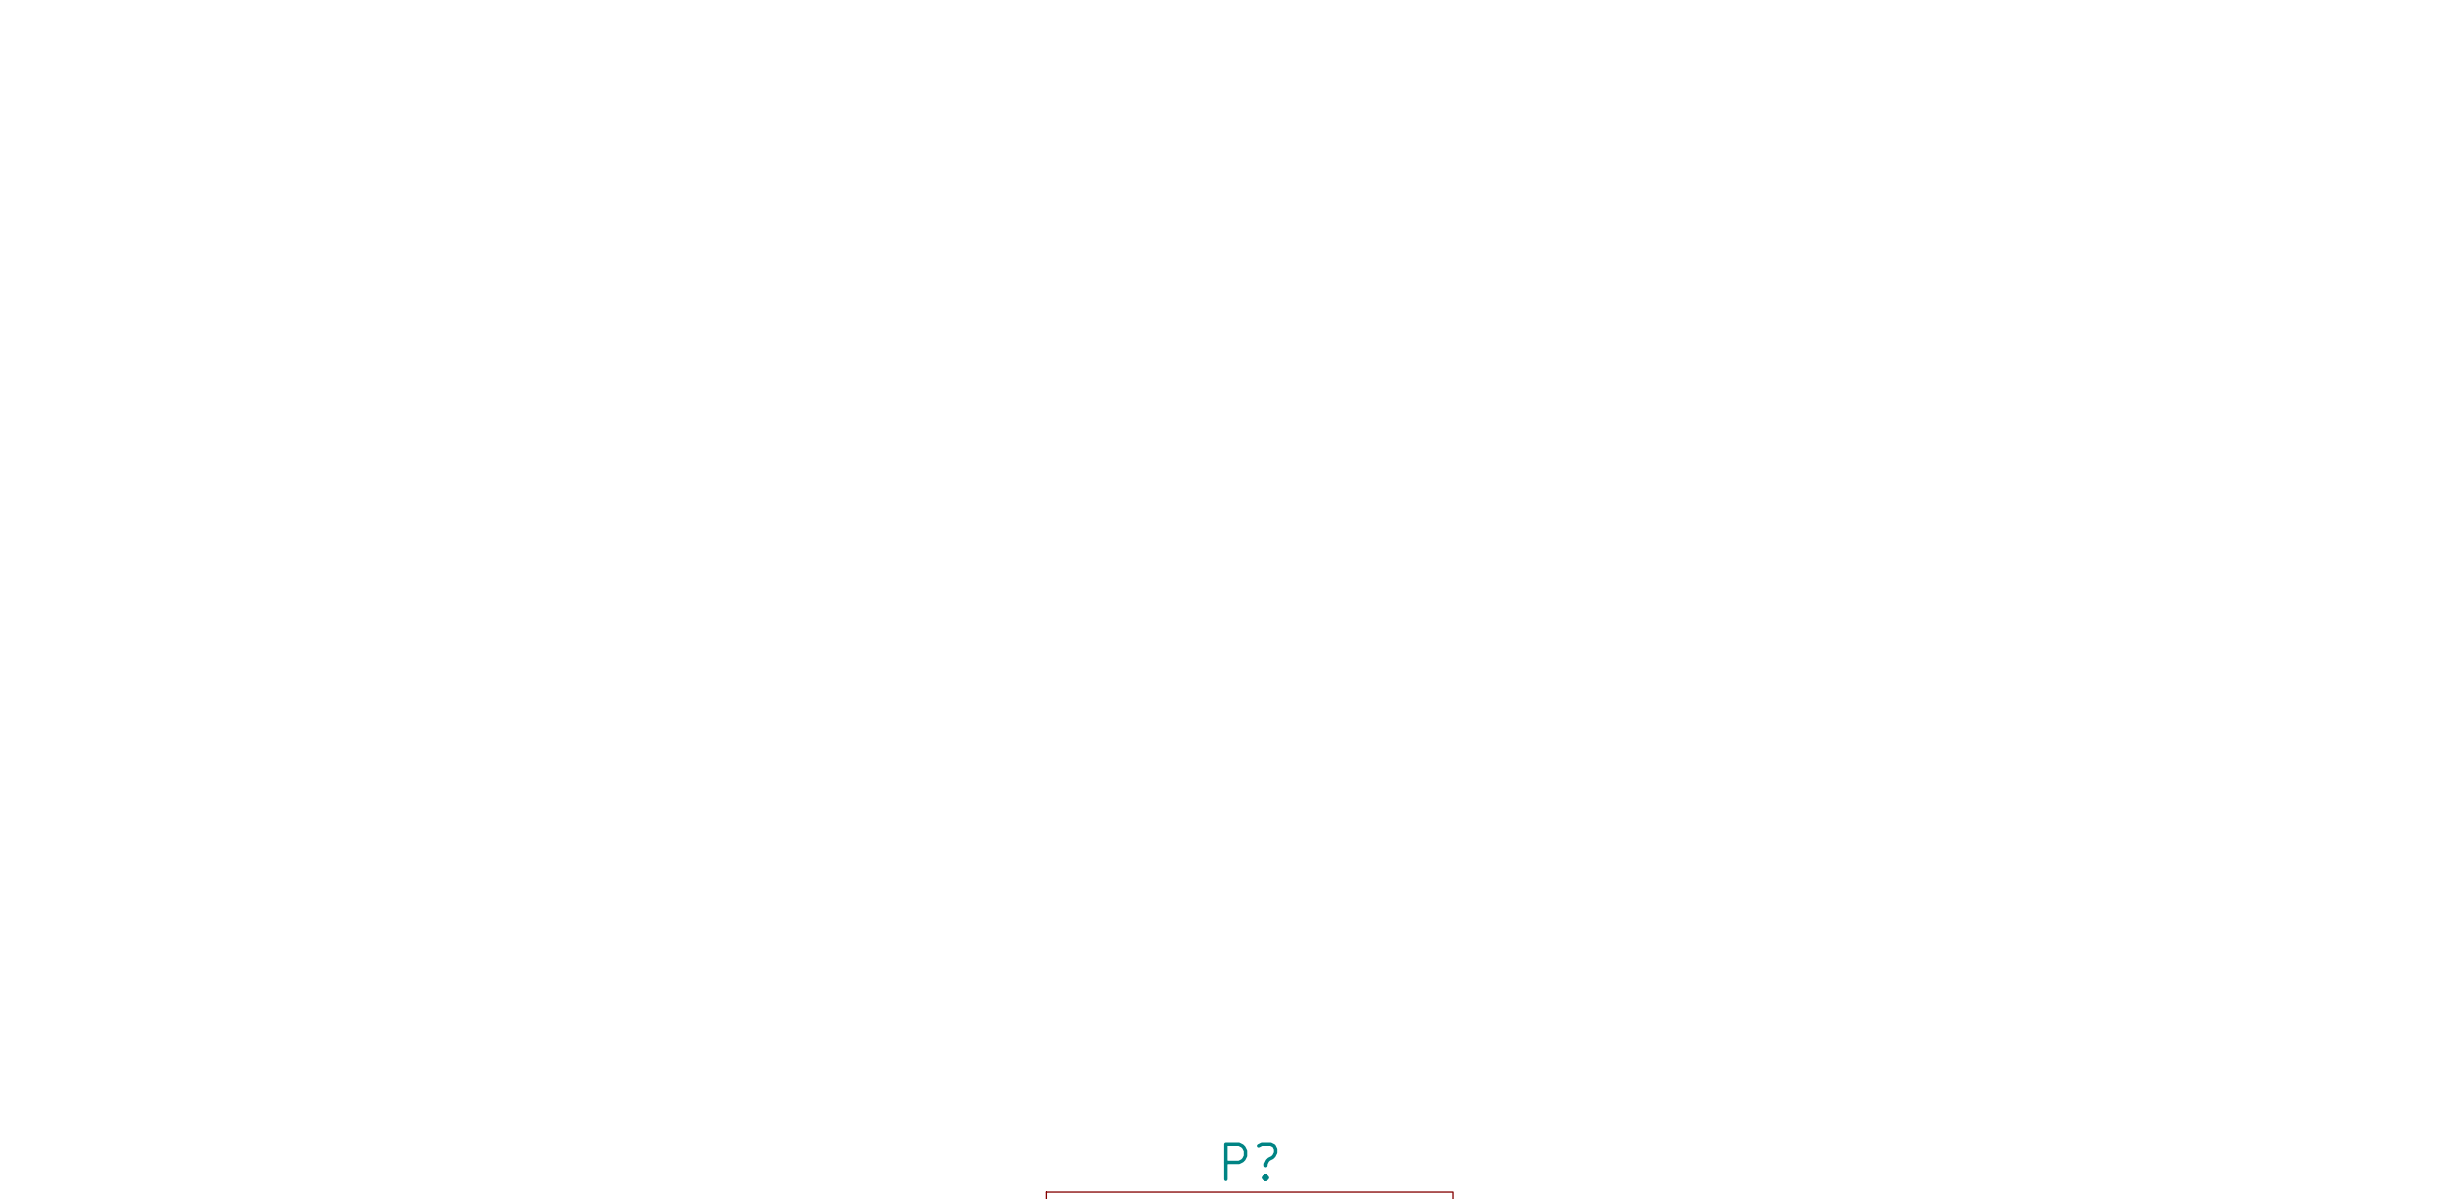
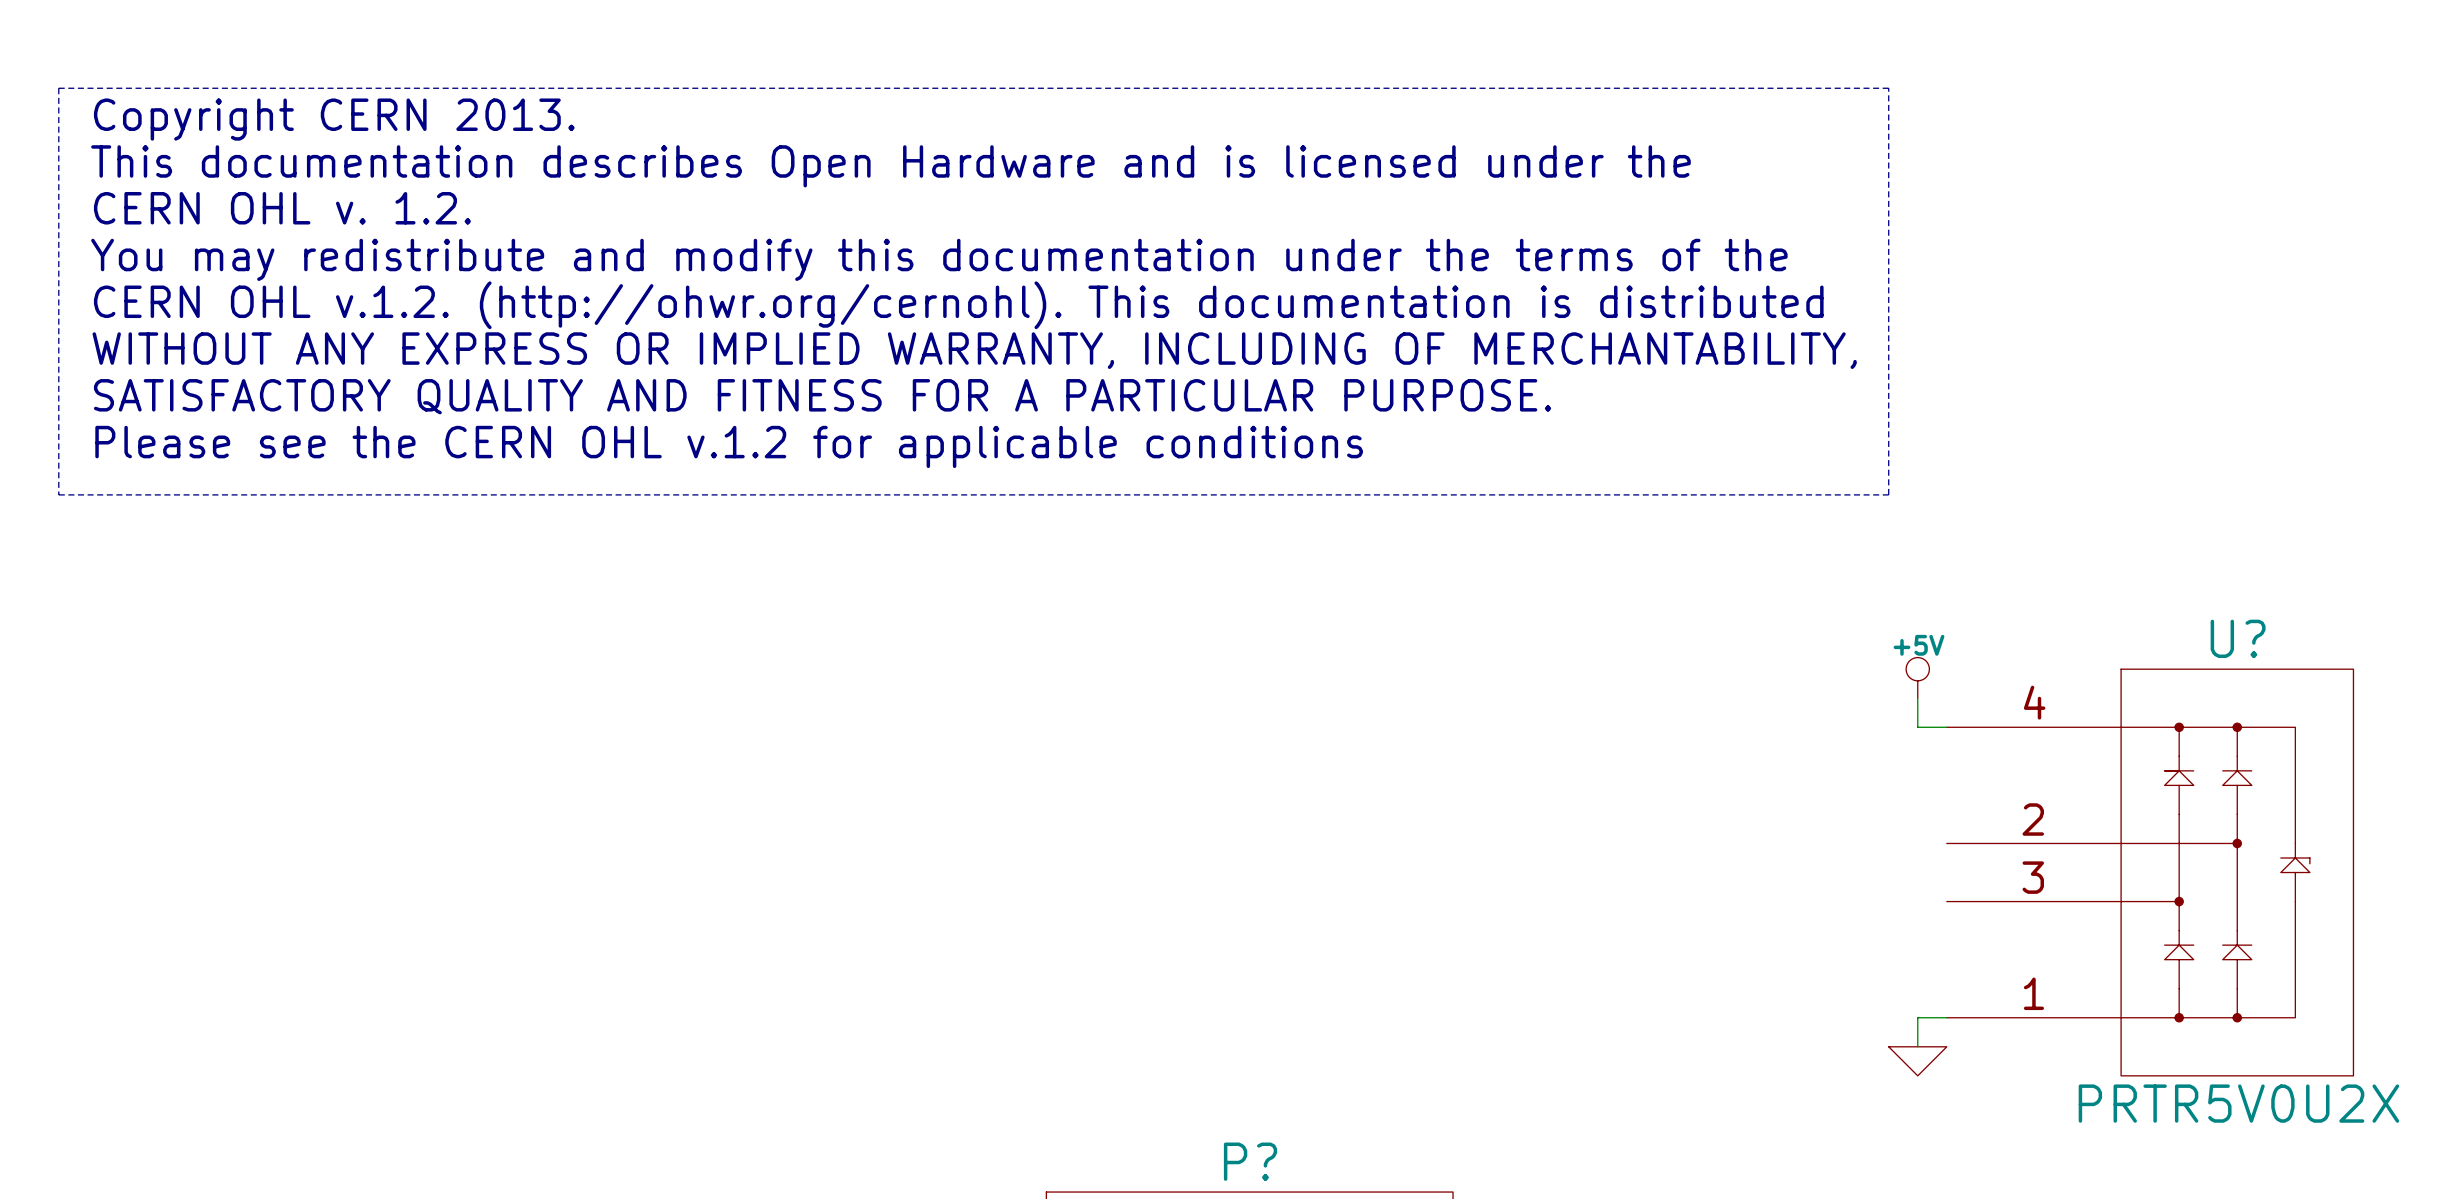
line: none -> (58, 88) (58, 494) (1888, 494) (1888, 88) (58, 88)
text: none -> Copyright CERN 2013. (334, 119)
text: none -> This documentation describes Open Hardware and is licensed under the (890, 166)
text: none -> CERN OHL v. 1.2. (282, 208)
text: none -> You may redistribute and modify this documentation under the terms of the (939, 259)
text: none -> CERN OHL v.1.2. (http://ohwr.org/cernohl). This documentation is distributed (958, 305)
text: none -> WITHOUT ANY EXPRESS OR IMPLIED WARRANTY, INCLUDING OF MERCHANTABILITY, (974, 350)
text: none -> SATISFACTORY QUALITY AND FITNESS FOR A PARTICULAR PURPOSE. (822, 396)
text: none -> Please see the CERN OHL v.1.2 for applicable conditions (729, 446)
power symbol: none -> +5V (1917, 677)
wire: none -> (1917, 698) (1917, 727) (1946, 727)
U?: none -> PRTR5V0U2X (2150, 872)
wire: none -> (1946, 1017) (1917, 1017) (1917, 1046)
power symbol: none -> (1917, 1061)

